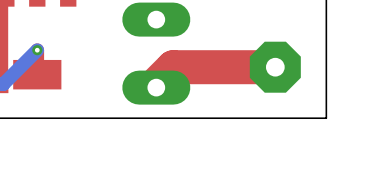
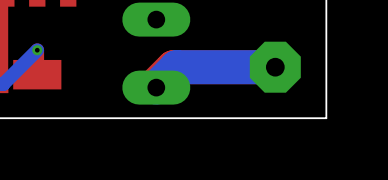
bottom track: none -> (275, 67) (176, 67) (156, 87)

